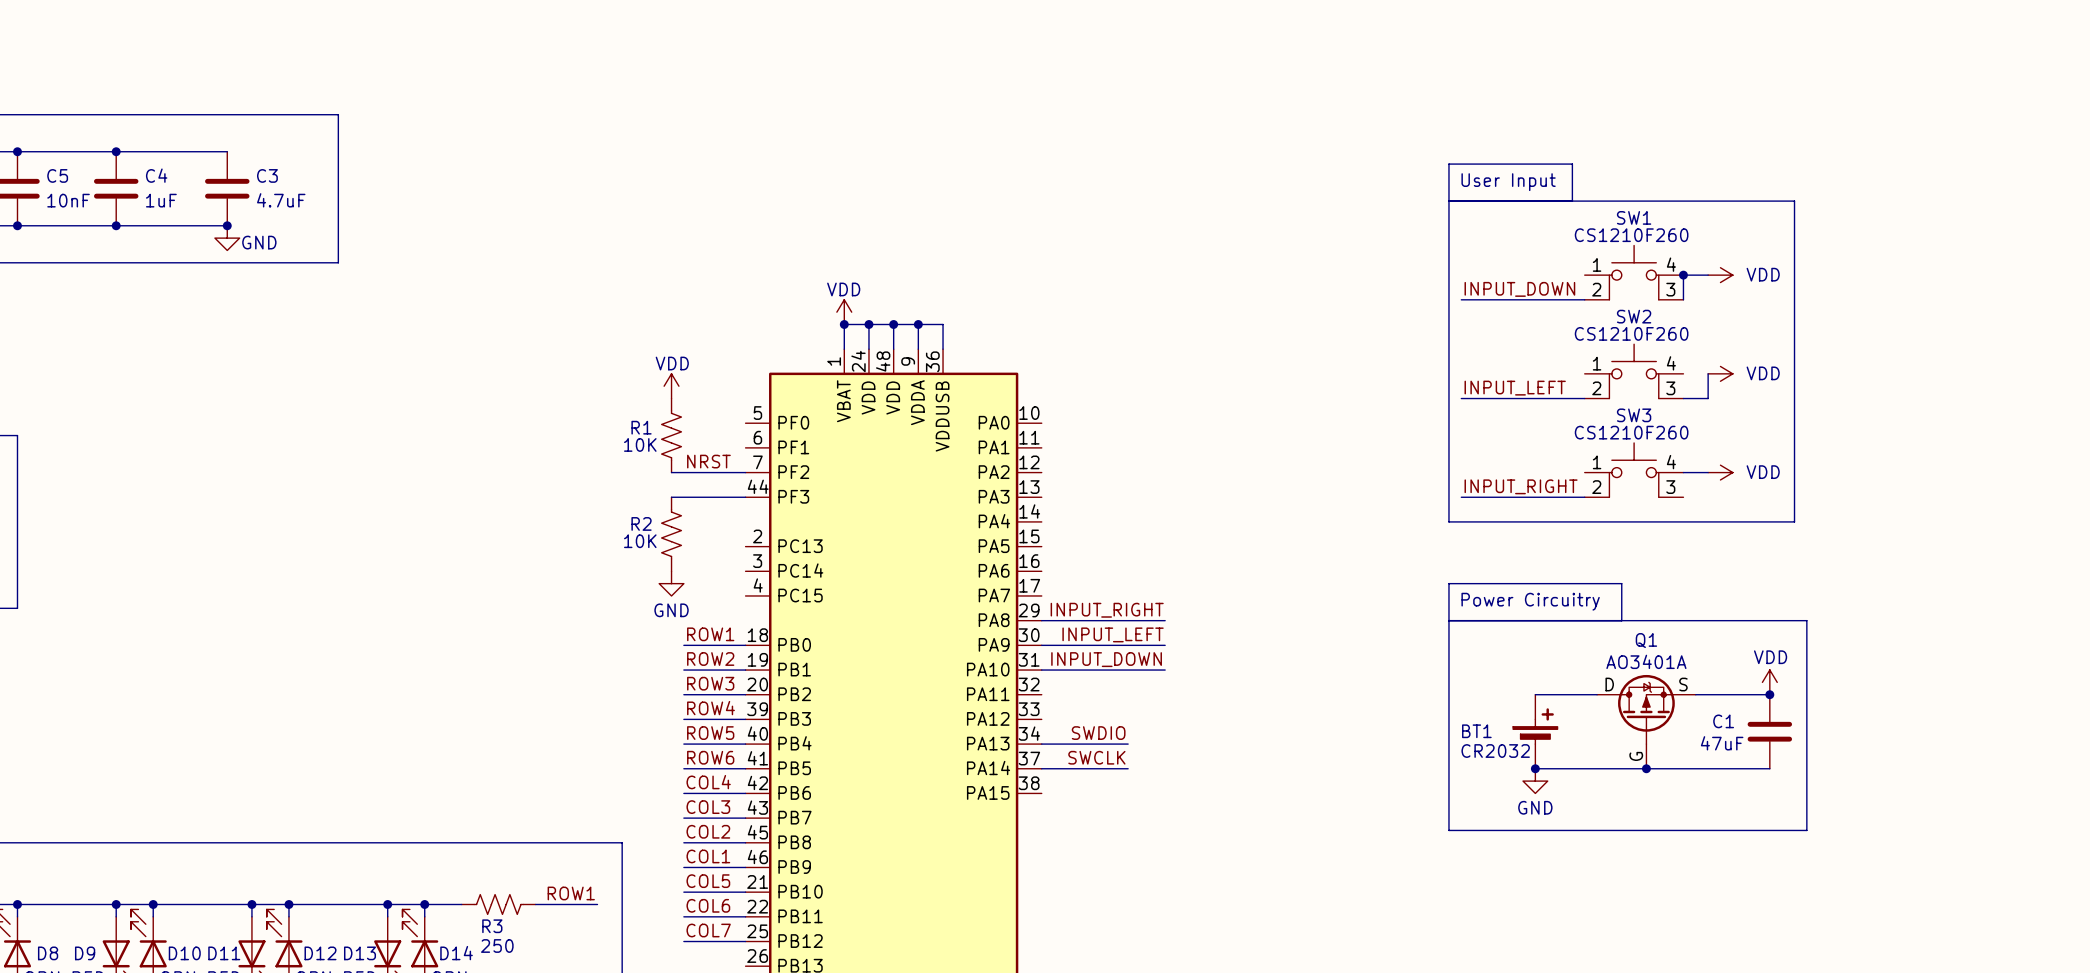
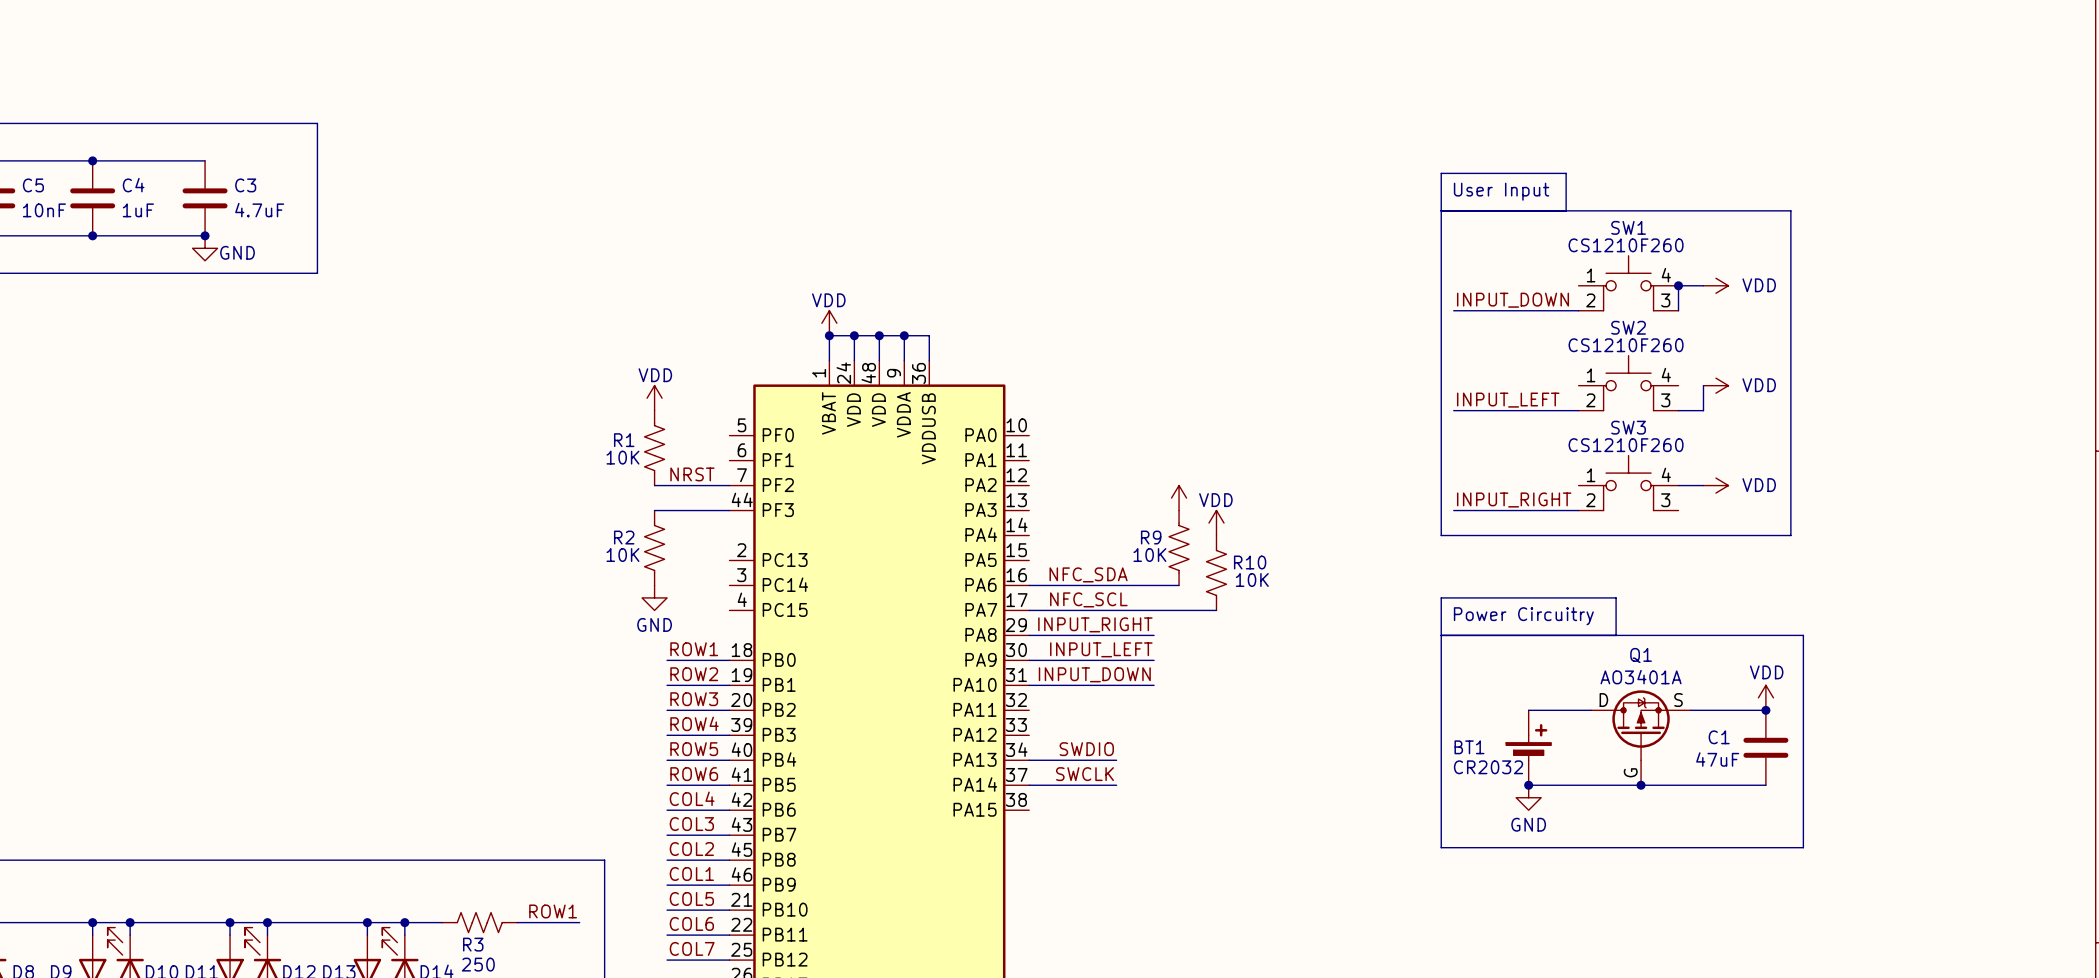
power symbol: none -> (1179, 498)
power symbol: none -> VDD (1216, 523)
R9: none -> 10K (1179, 548)
R10: none -> 10K (1216, 572)
label: none -> NFC_SDA (1088, 574)
wire: none -> (1029, 585) (1179, 585)
label: none -> NFC_SCL (1088, 599)
wire: none -> (1029, 610) (1216, 610)

